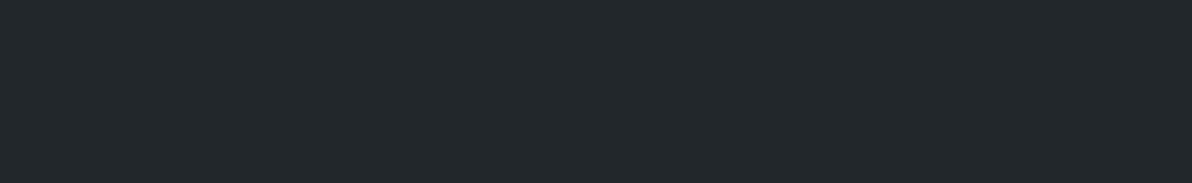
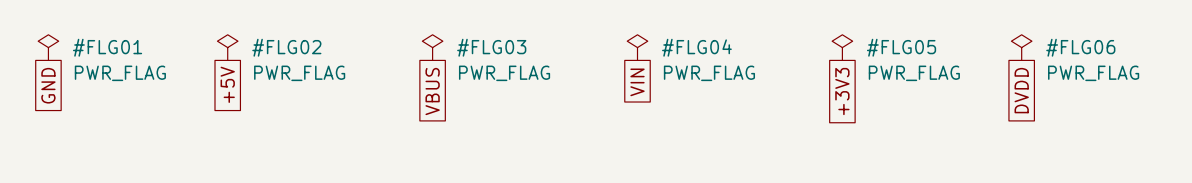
#FLG01: none -> PWR_FLAG (48, 47)
#FLG02: none -> PWR_FLAG (227, 47)
#FLG03: none -> PWR_FLAG (432, 47)
#FLG04: none -> PWR_FLAG (637, 47)
#FLG05: none -> PWR_FLAG (842, 47)
#FLG06: none -> PWR_FLAG (1021, 47)
global label: none -> GND (48, 85)
global label: none -> +5V (227, 84)
global label: none -> VIN (637, 82)
global label: none -> DVDD (1021, 90)
global label: none -> VBUS (432, 91)
global label: none -> +3V3 (842, 91)

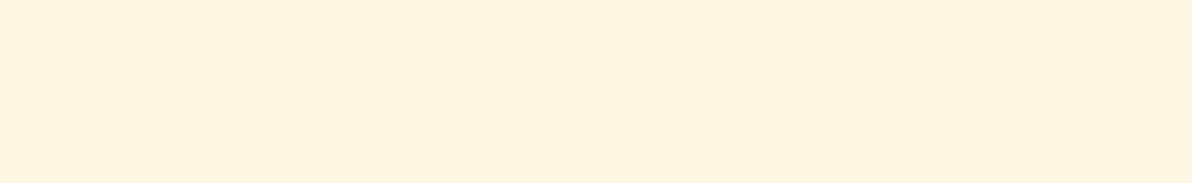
#FLG01: PWR_FLAG (48, 47) -> none
#FLG02: PWR_FLAG (227, 47) -> none
#FLG03: PWR_FLAG (432, 47) -> none
#FLG04: PWR_FLAG (637, 47) -> none
#FLG05: PWR_FLAG (842, 47) -> none
#FLG06: PWR_FLAG (1021, 47) -> none
global label: VIN (637, 82) -> none
global label: +5V (227, 84) -> none
global label: GND (48, 85) -> none
global label: DVDD (1021, 90) -> none
global label: VBUS (432, 91) -> none
global label: +3V3 (842, 91) -> none

